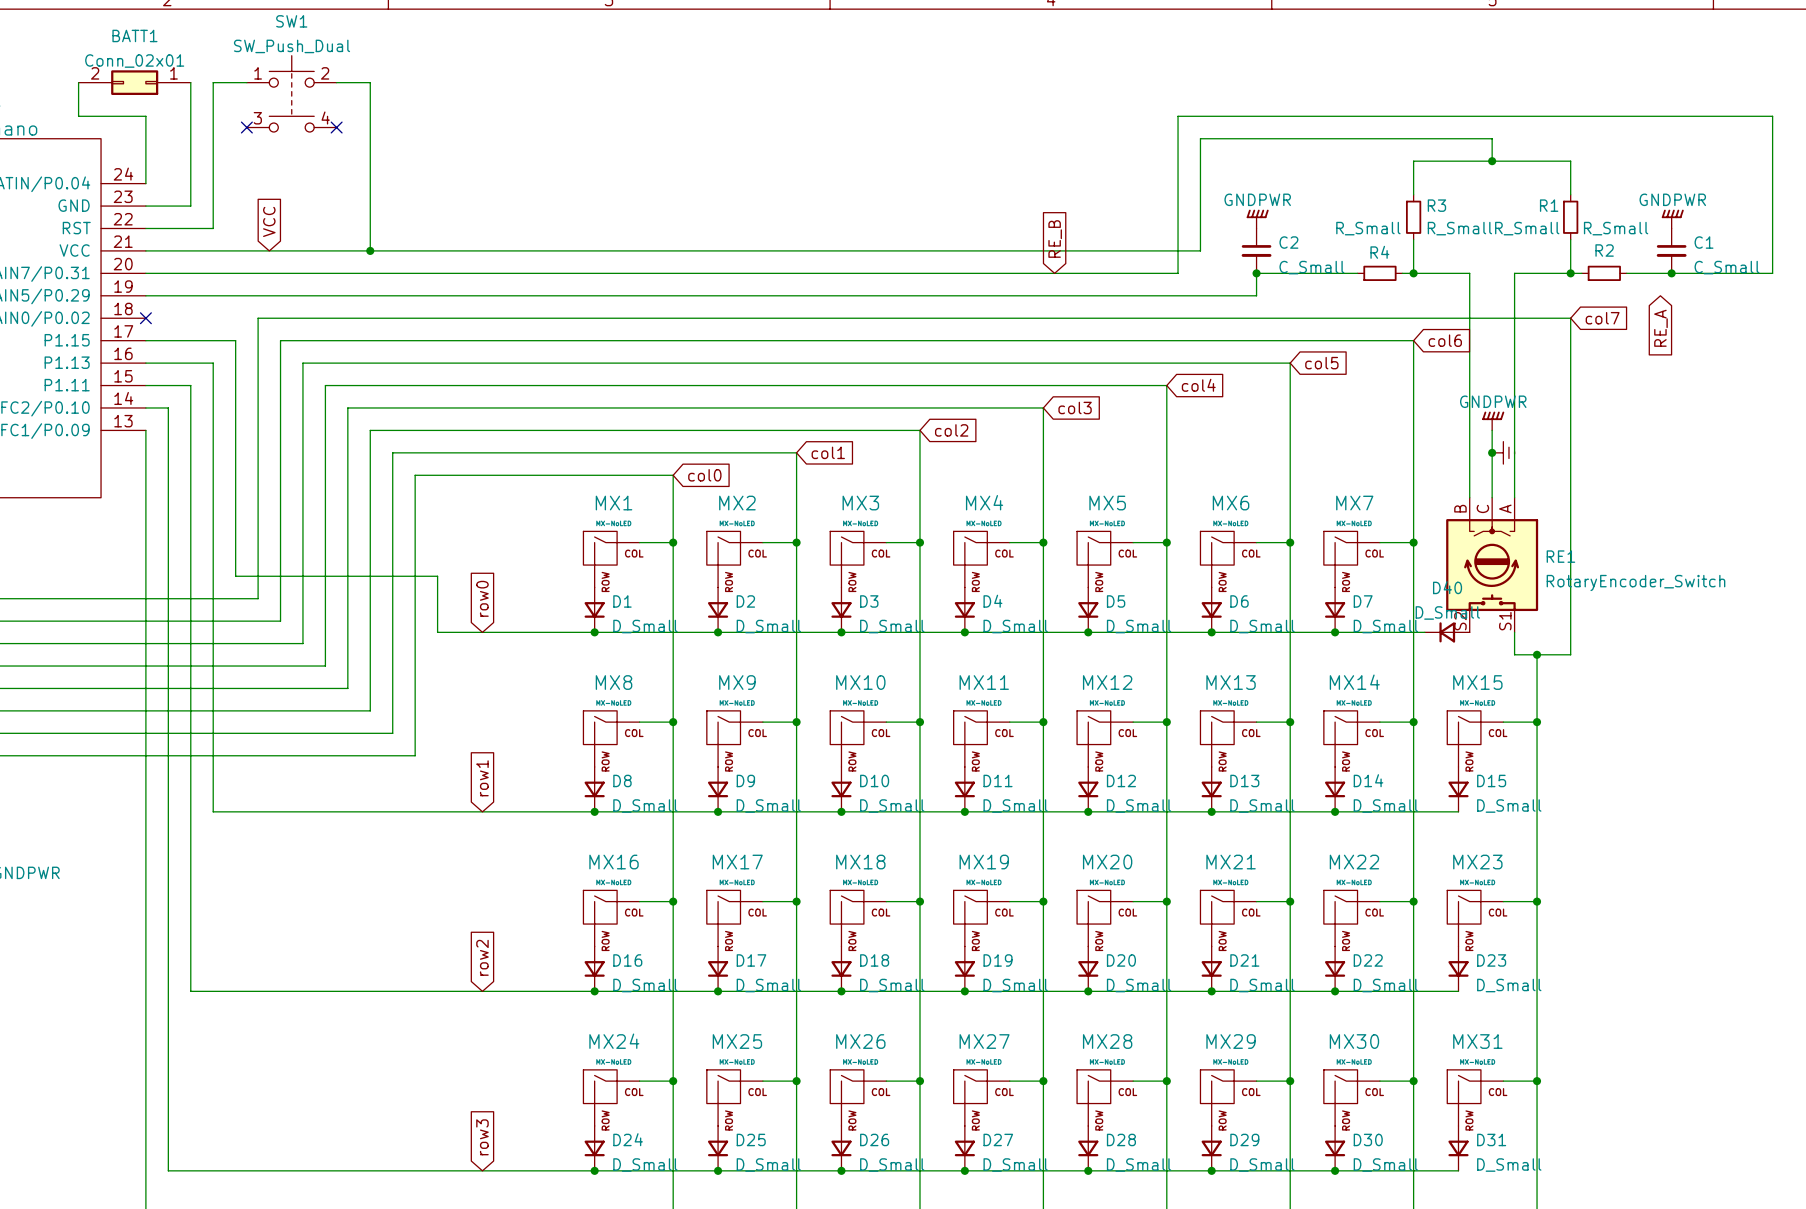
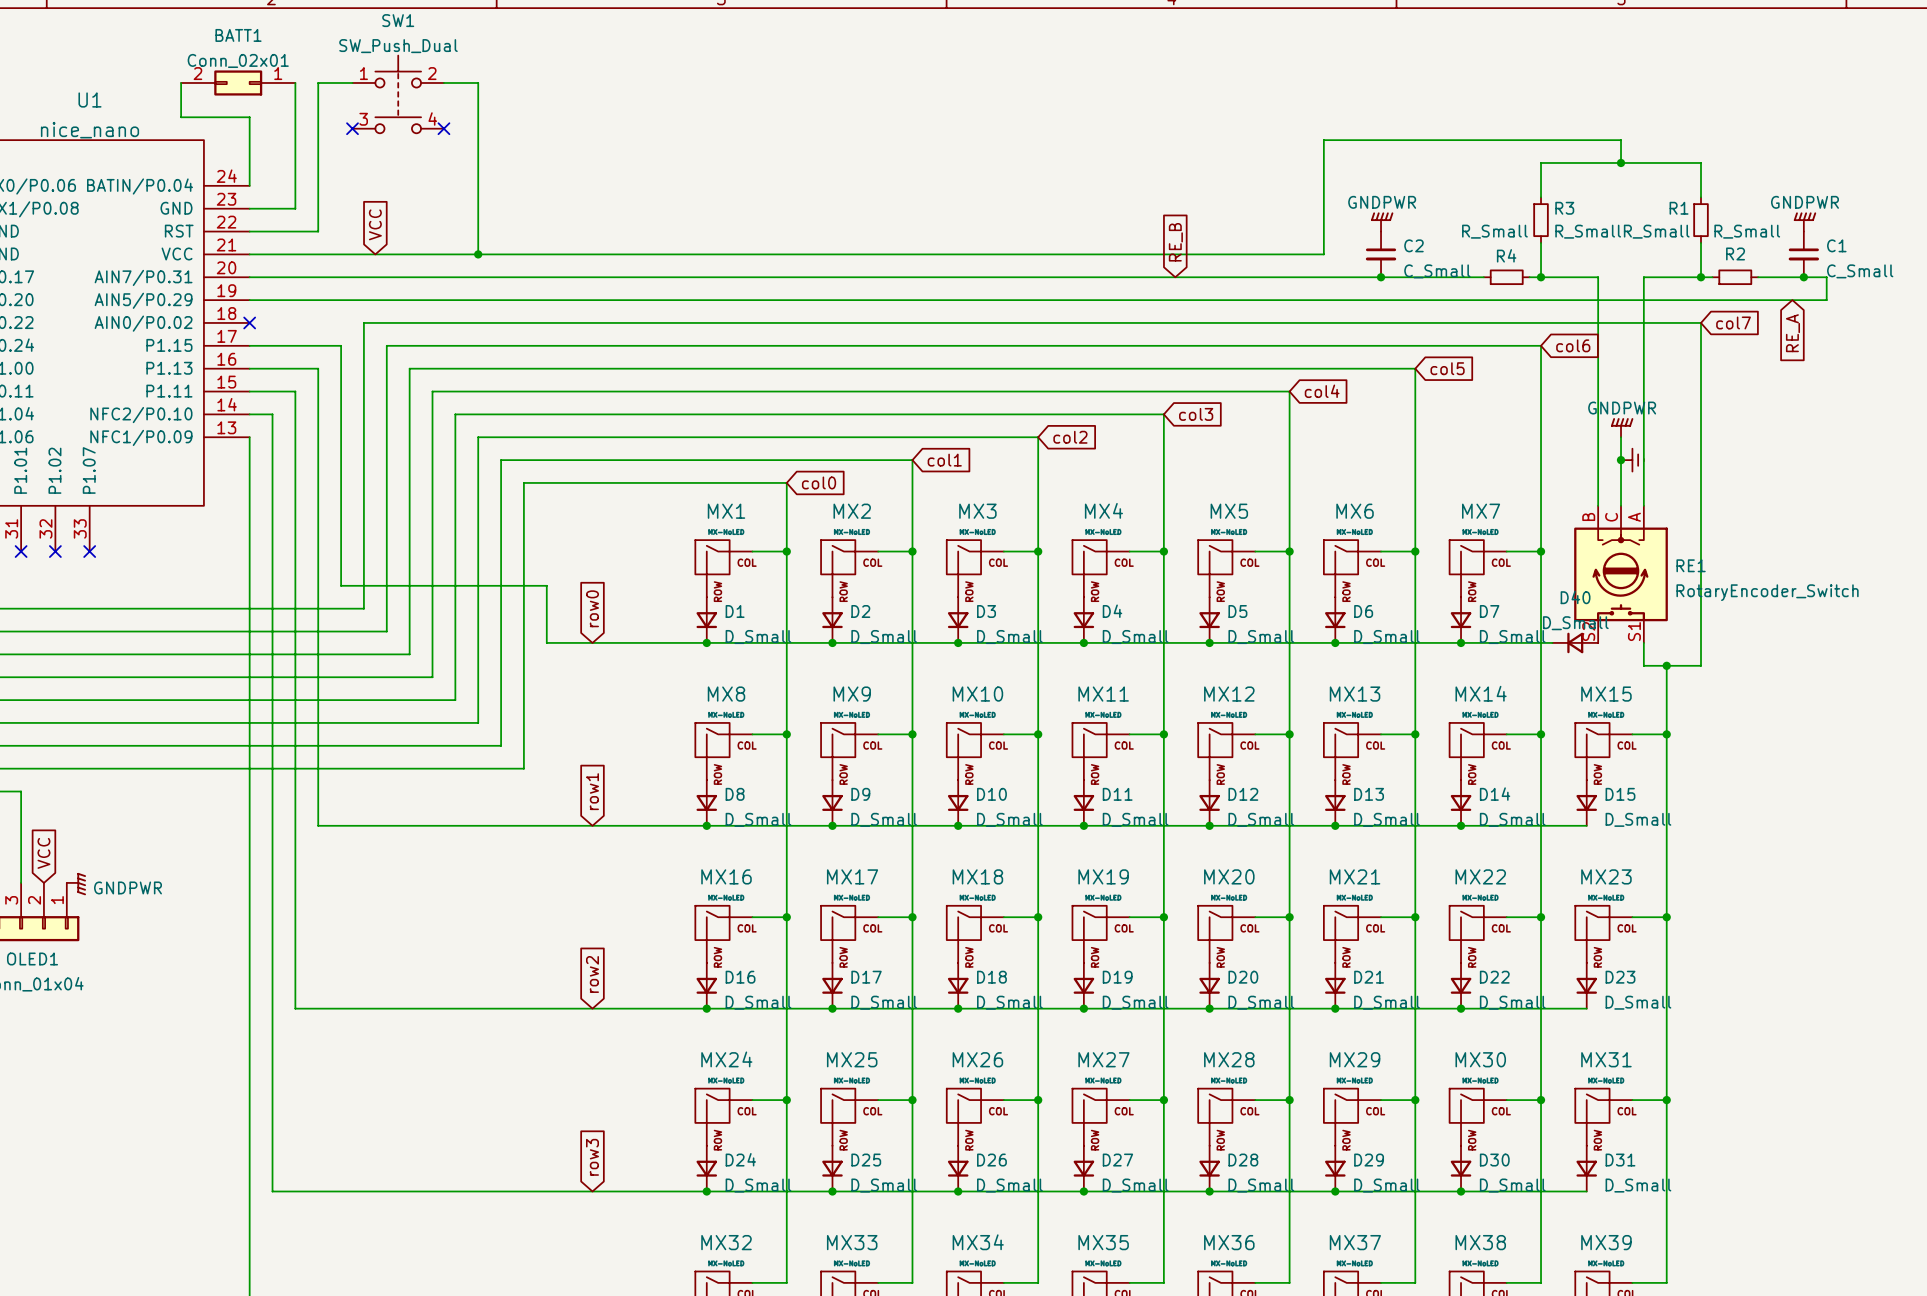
wire: (1178, 273) (1178, 116) (1772, 116) (1772, 273) (1694, 273) -> (1381, 300) (1826, 300) (1826, 277)
wire: (1256, 273) (1256, 295) -> (1381, 277) (1301, 277)

